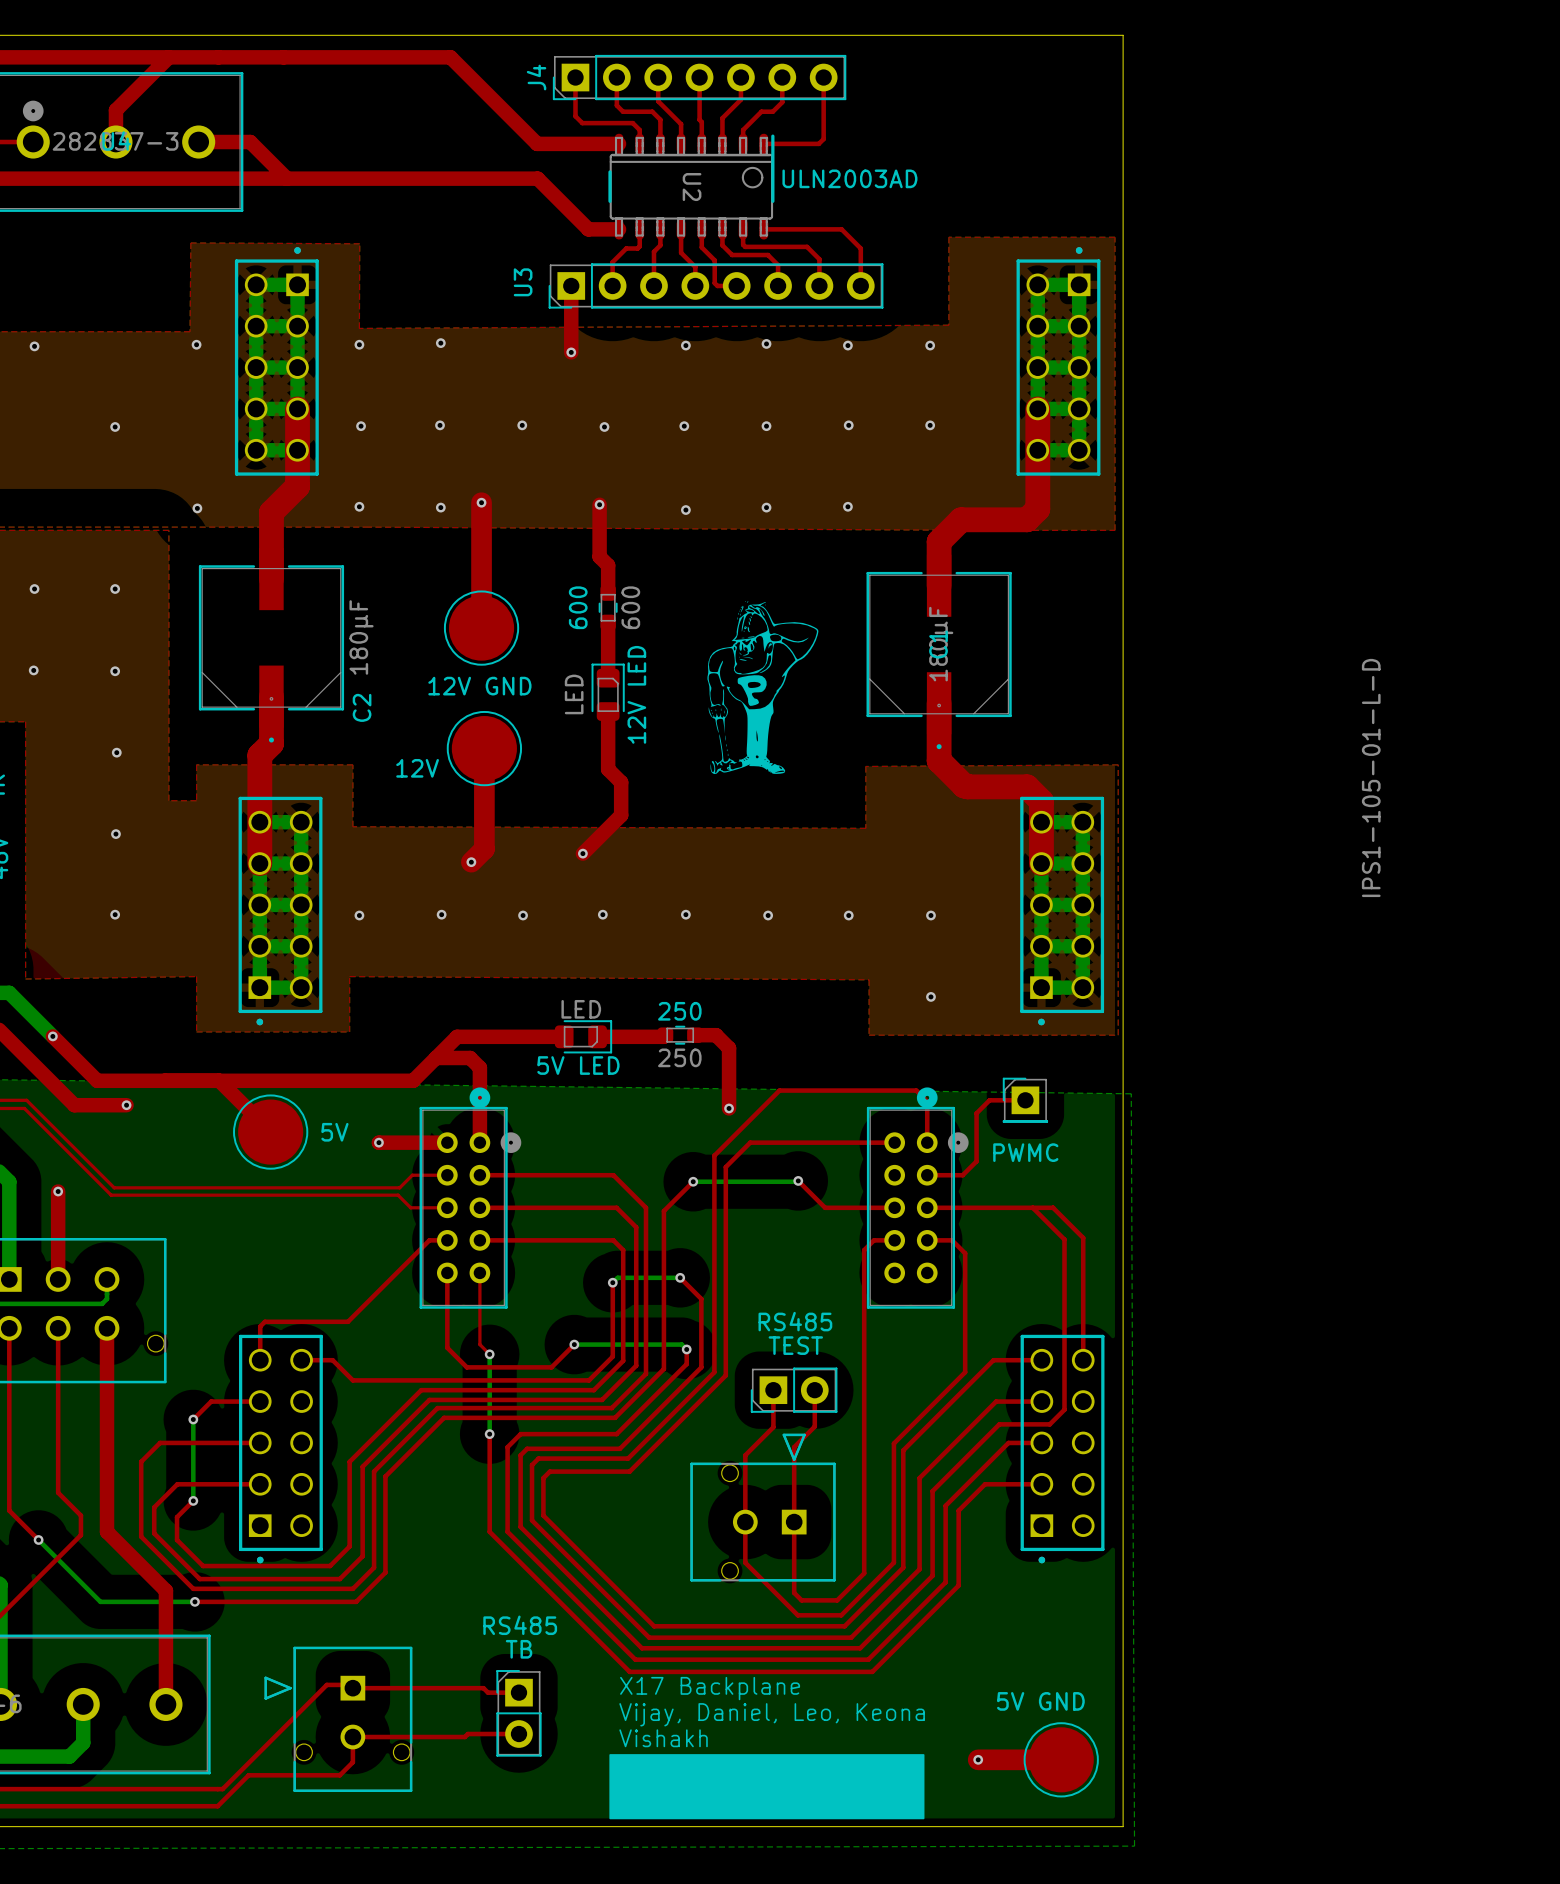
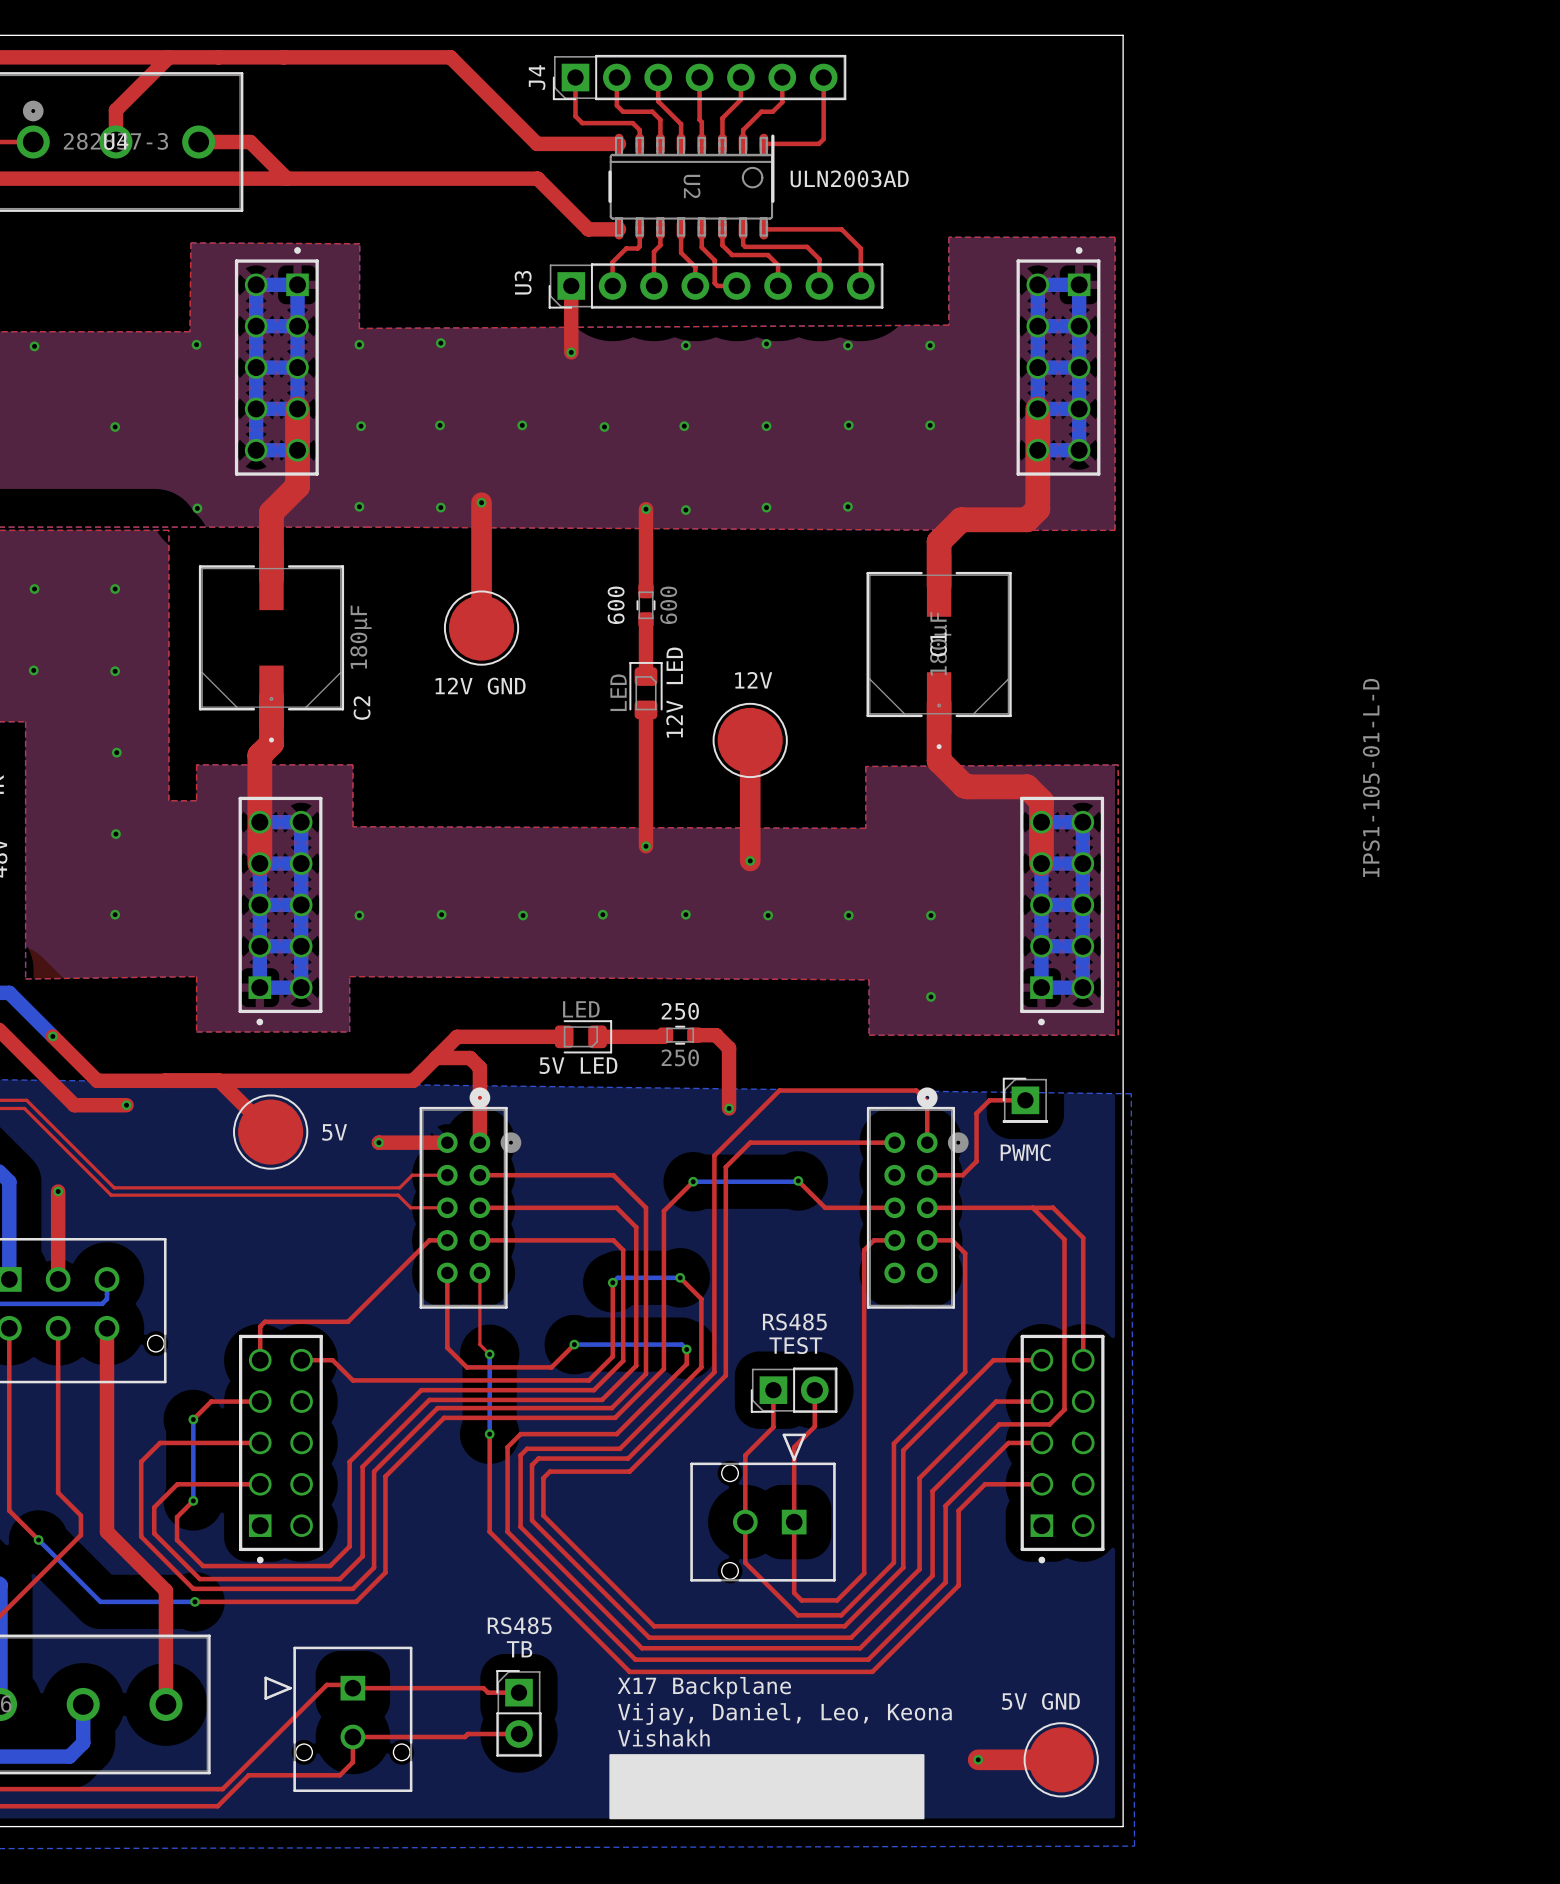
top track: (599, 504) (599, 556) (608, 565) (608, 592) -> none
via position: (599, 504) -> (646, 509)
top track: none -> (646, 509) (646, 590)
drawing: [707, 601, 819, 775] -> none
600 position: (608, 607) -> (646, 605)
top track: none -> (646, 620) (646, 676)
top track: (608, 622) (608, 678) -> none
12V LED position: (608, 692) -> (646, 690)
12V LED value position: LED (574, 694) -> LED (618, 692)
top track: none -> (646, 709) (646, 846)
top track: (608, 711) (608, 769) (621, 782) (621, 815) (582, 853) -> none
top track: none -> (750, 740) (750, 860)
top track: (484, 748) (484, 849) (471, 862) -> none
12V position: (484, 748) -> (750, 740)
12V name position: 12V (417, 768) -> 12V (753, 680)
via position: (582, 853) -> (646, 846)
via: none -> (750, 860)
via: (471, 862) -> none

